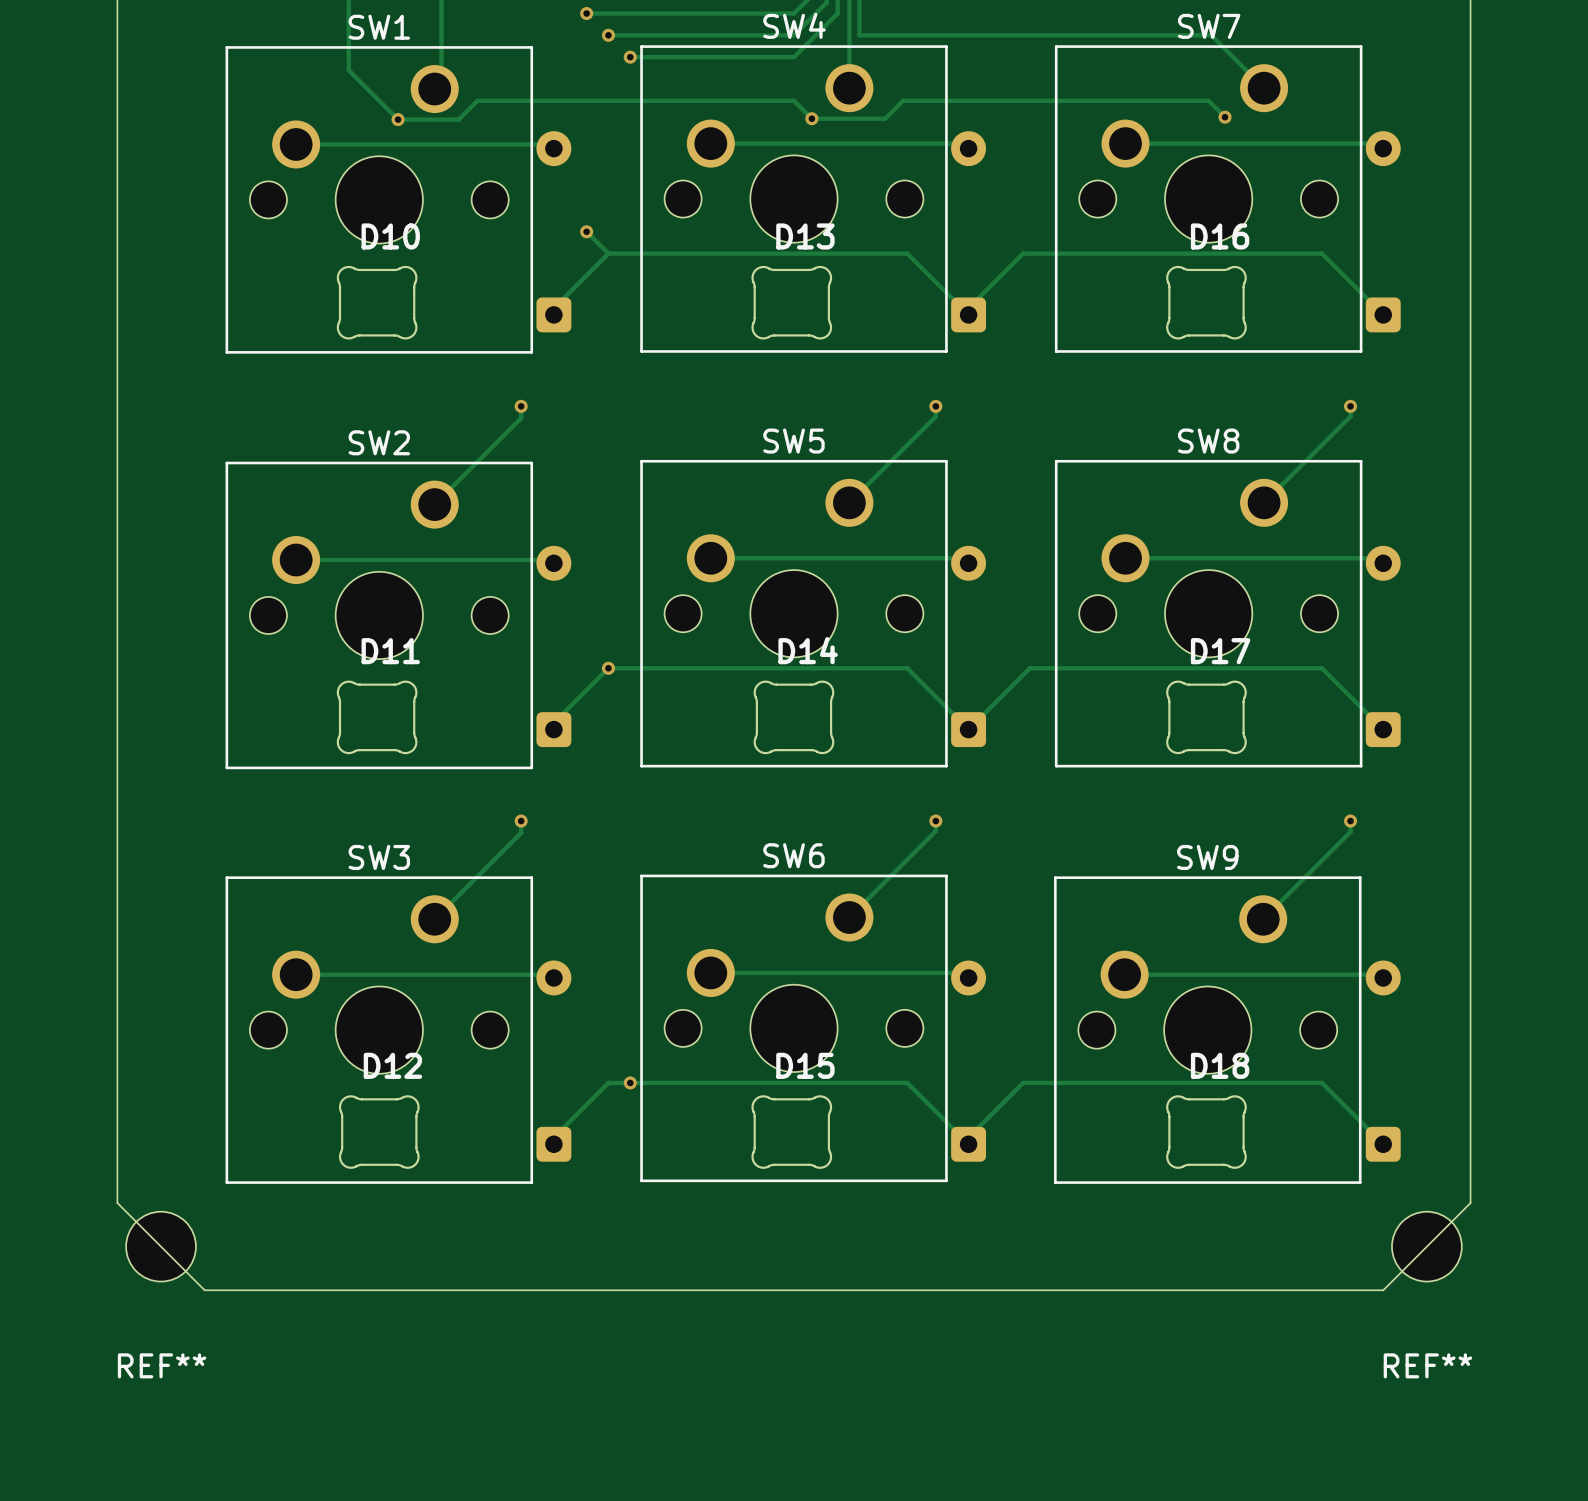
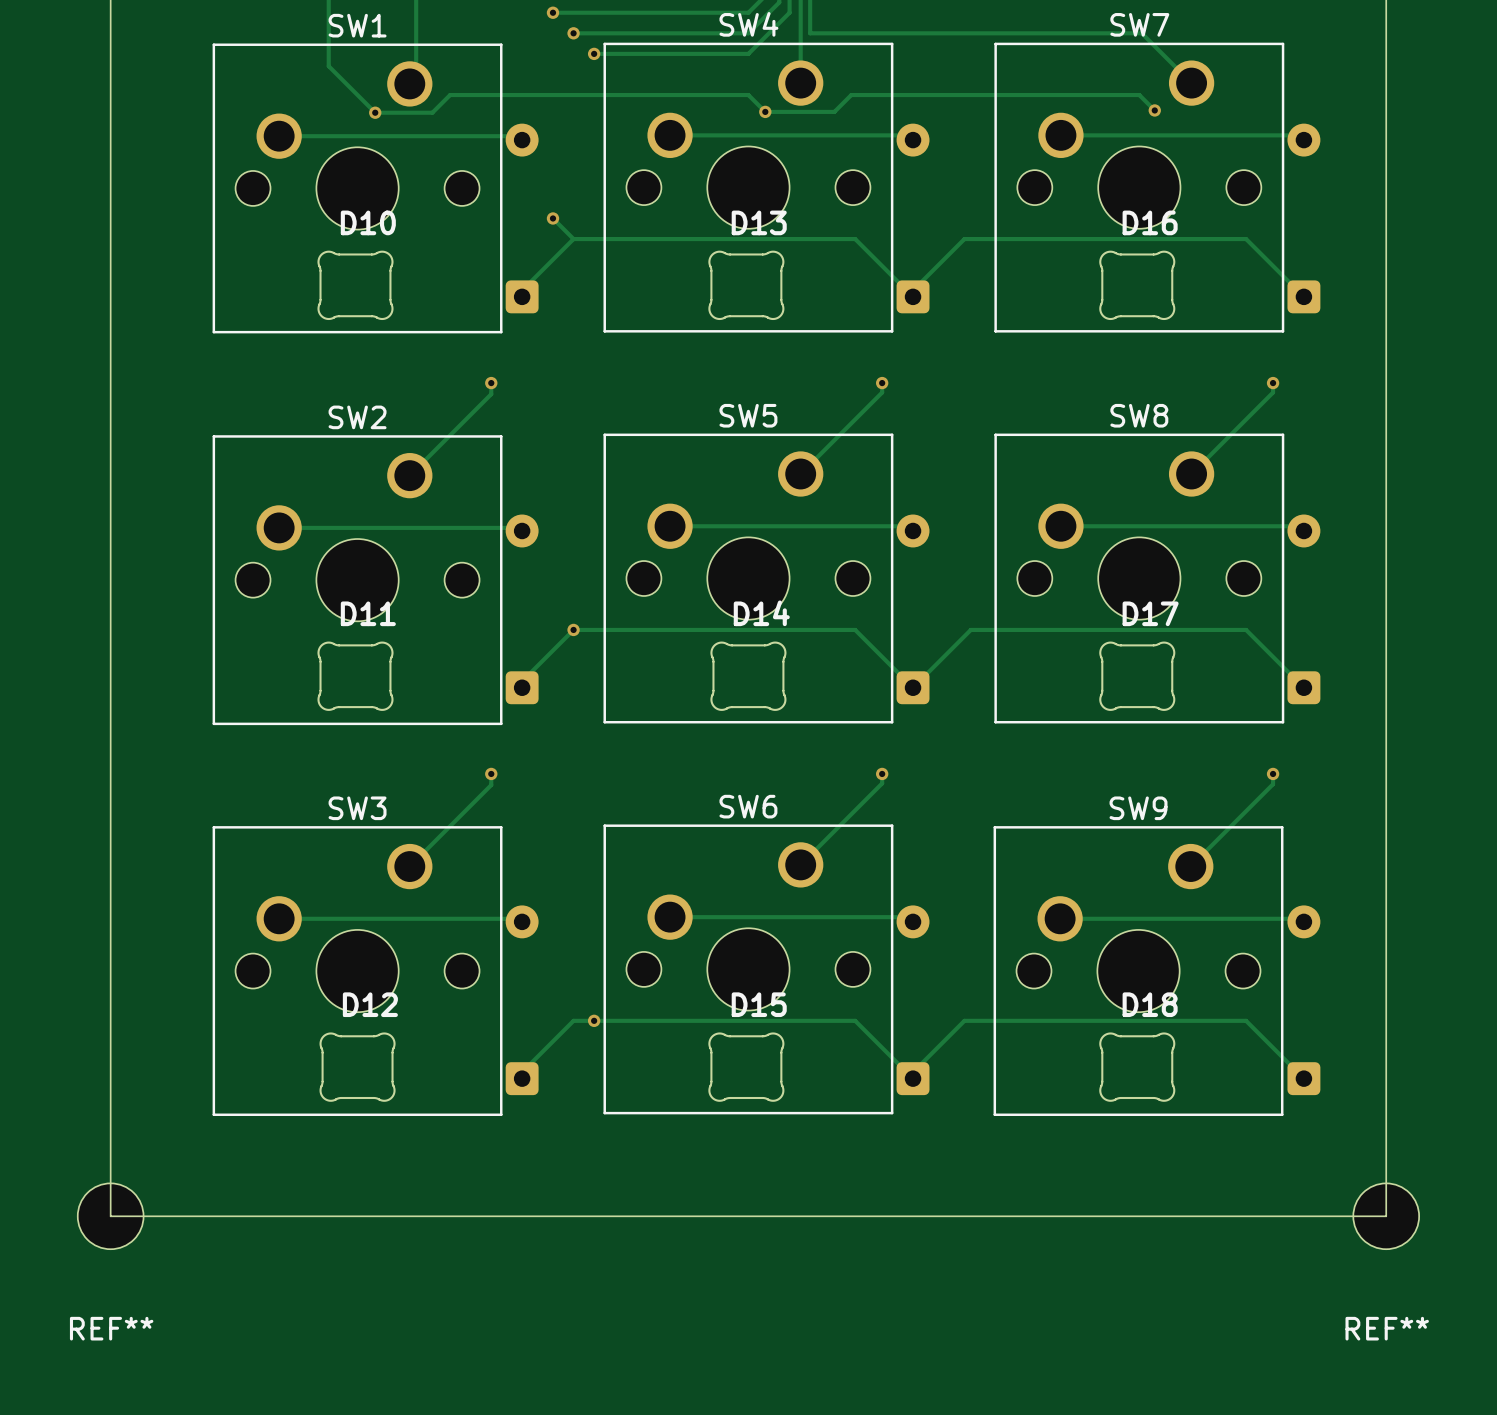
board edge: (117, 1202) (204, 1290) -> (110, 1133) (110, 1216) (192, 1216)
board edge: (1470, 1202) (1383, 1290) -> (1386, 1133) (1386, 1216) (1303, 1216)
REF** position: (161, 1246) -> (110, 1216)
REF** position: (1426, 1246) -> (1386, 1216)

